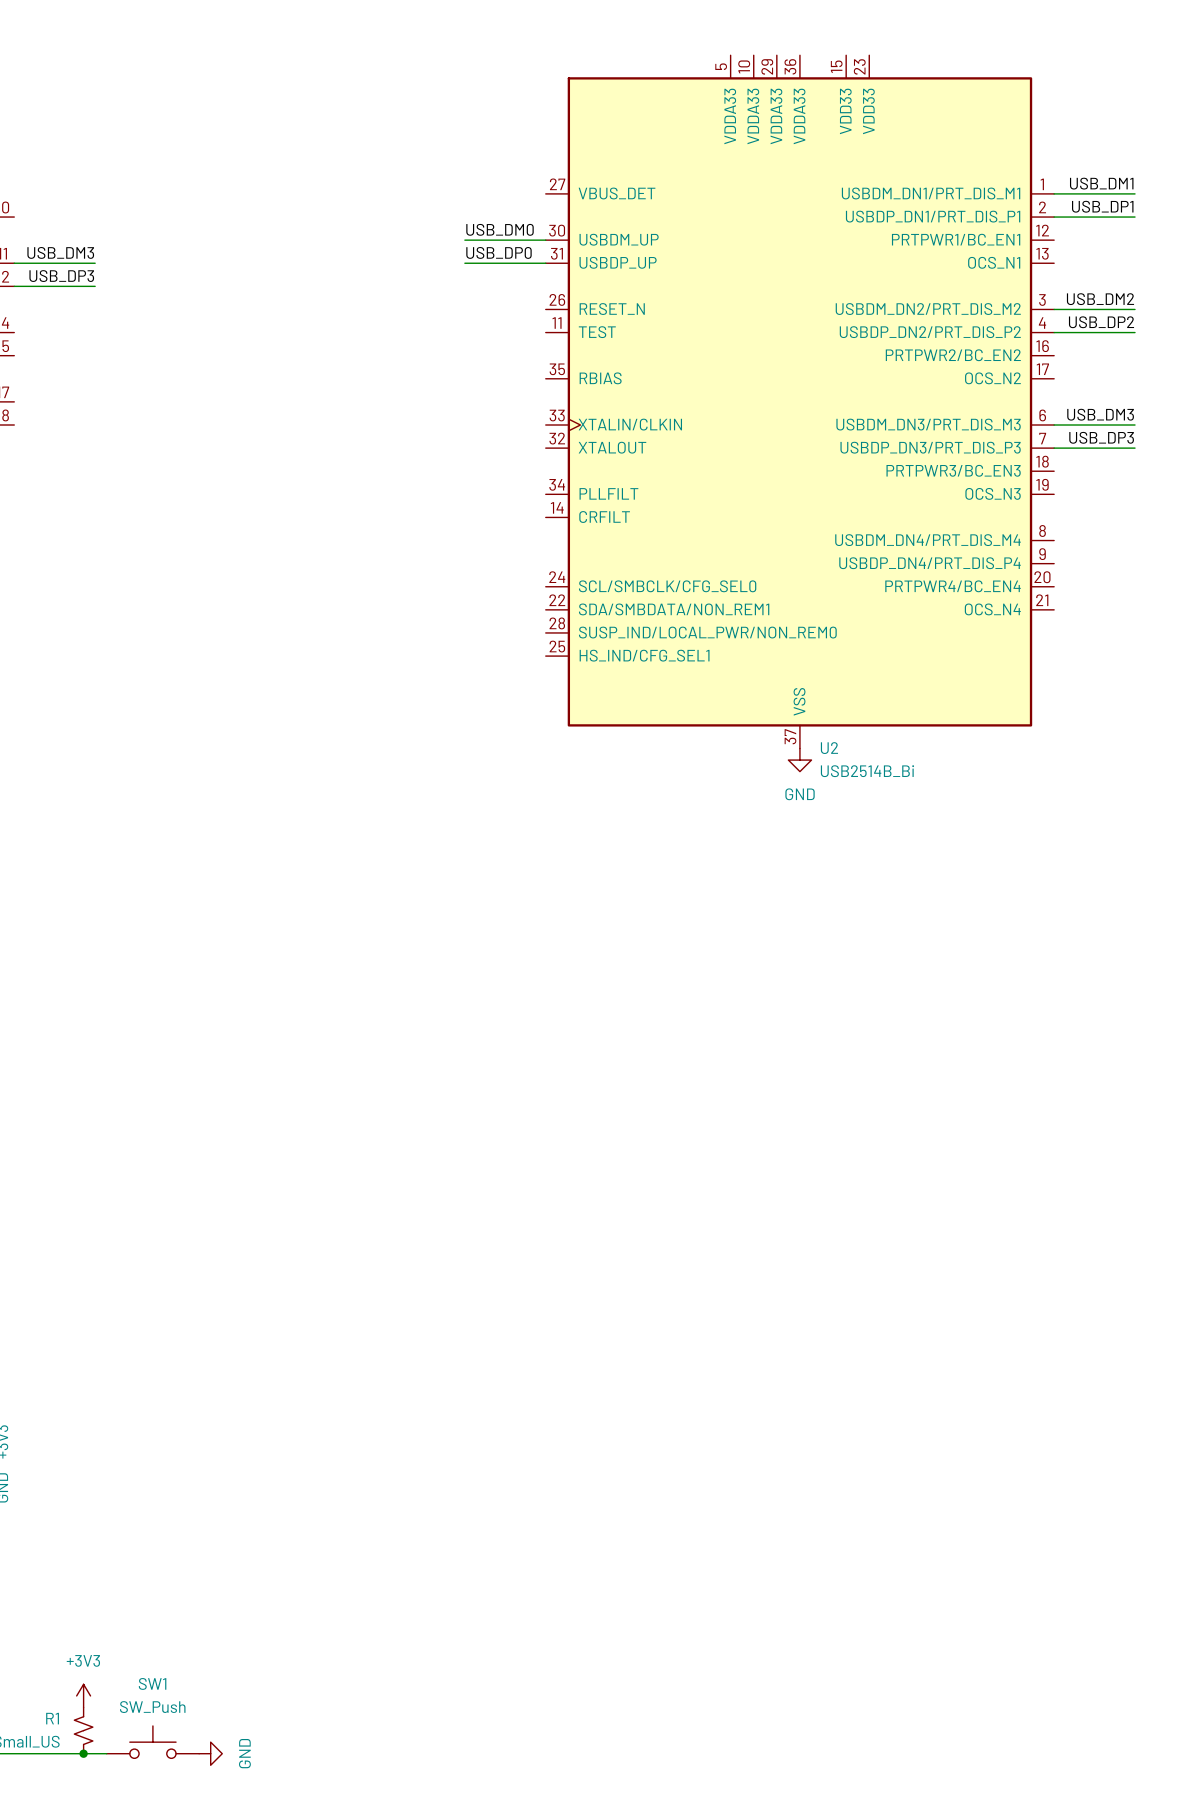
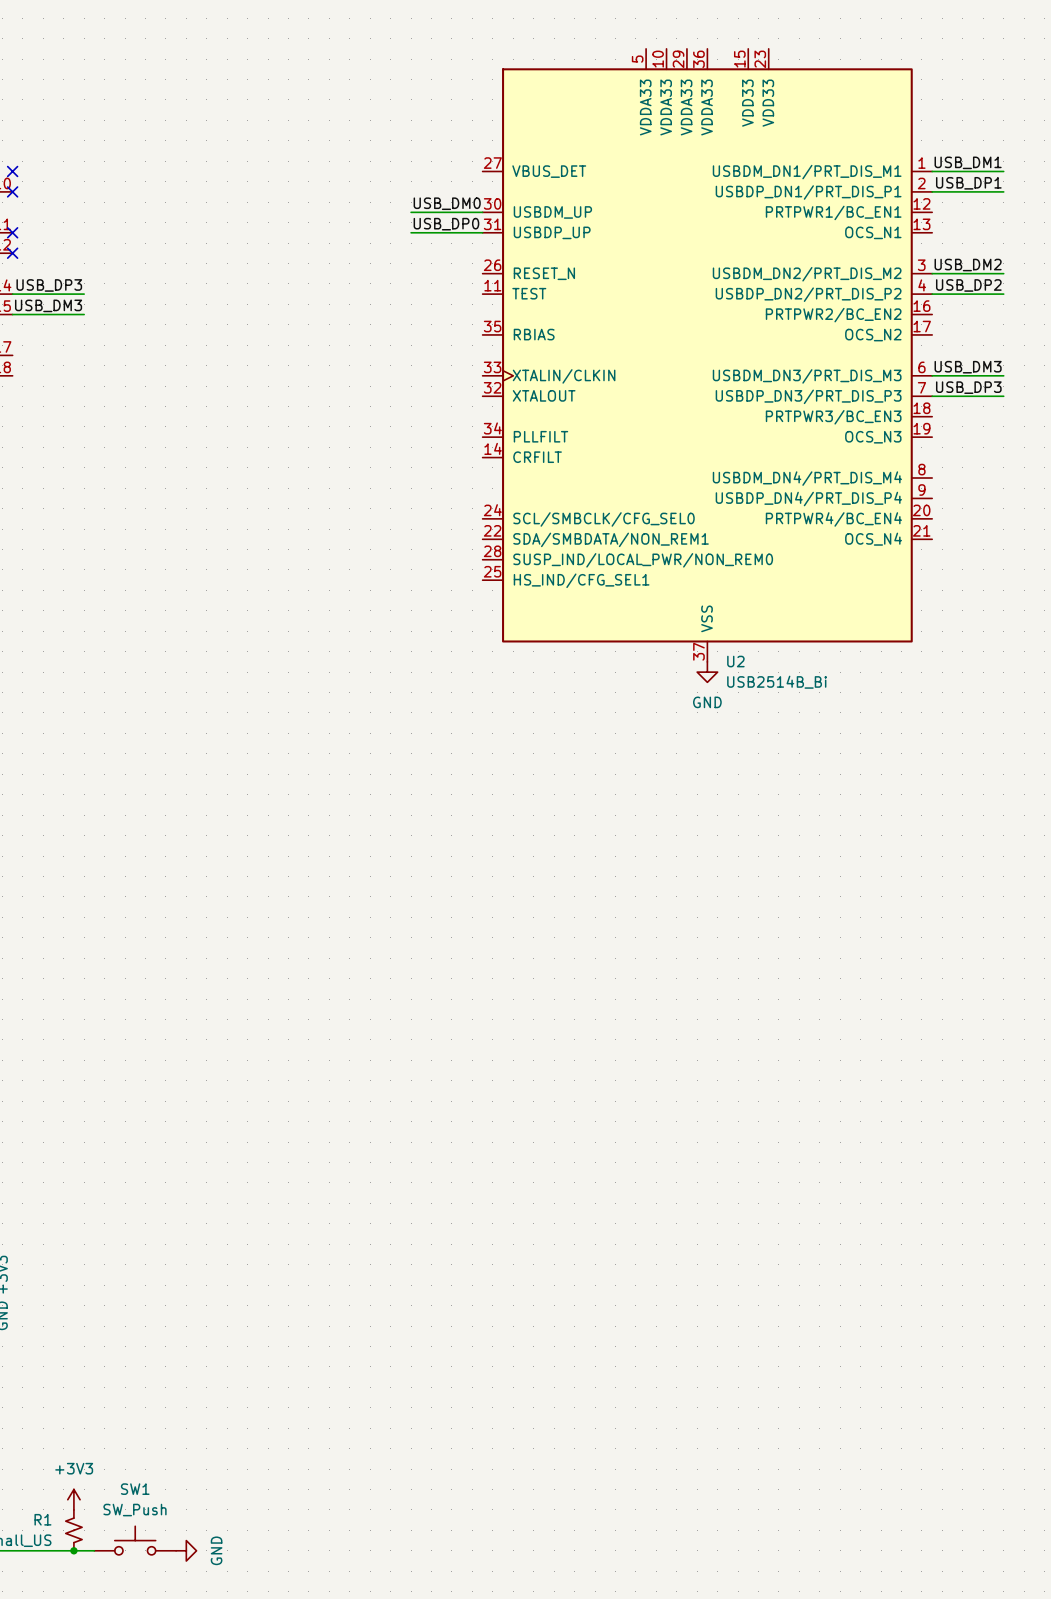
no-connect mark: none -> (12, 171)
no-connect mark: none -> (12, 191)
label position: USB_DM3 (60, 252) -> USB_DM3 (48, 305)
wire: (14, 263) (95, 263) -> (12, 314) (84, 314)
no-connect mark: none -> (12, 232)
label position: USB_DP3 (61, 276) -> USB_DP3 (49, 285)
wire: (14, 286) (95, 286) -> (12, 294) (84, 294)
no-connect mark: none -> (12, 253)

